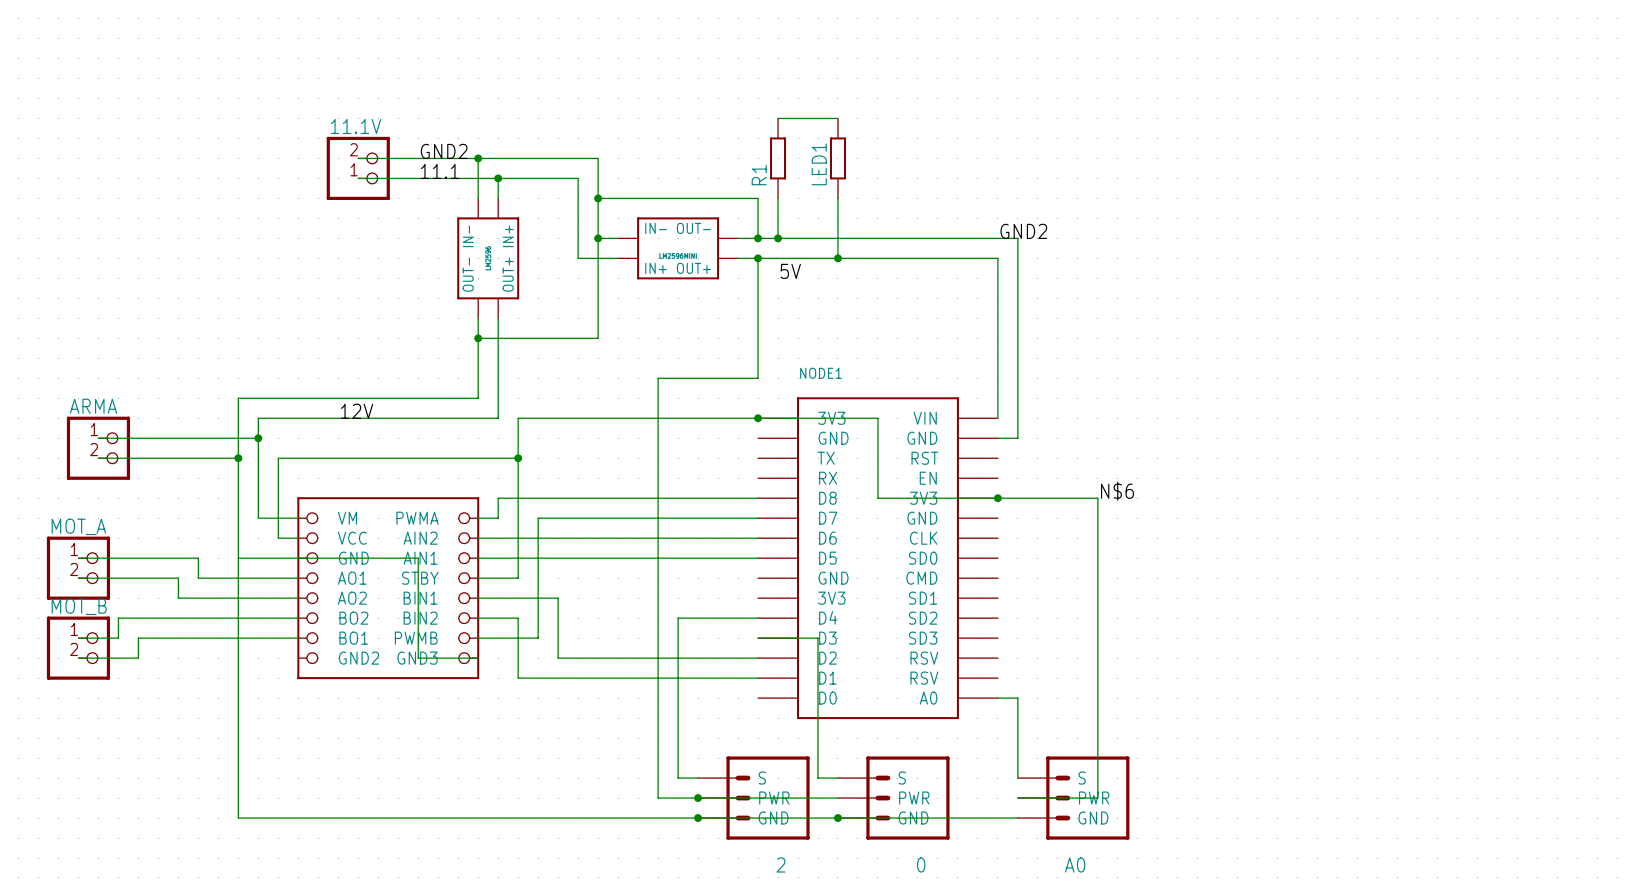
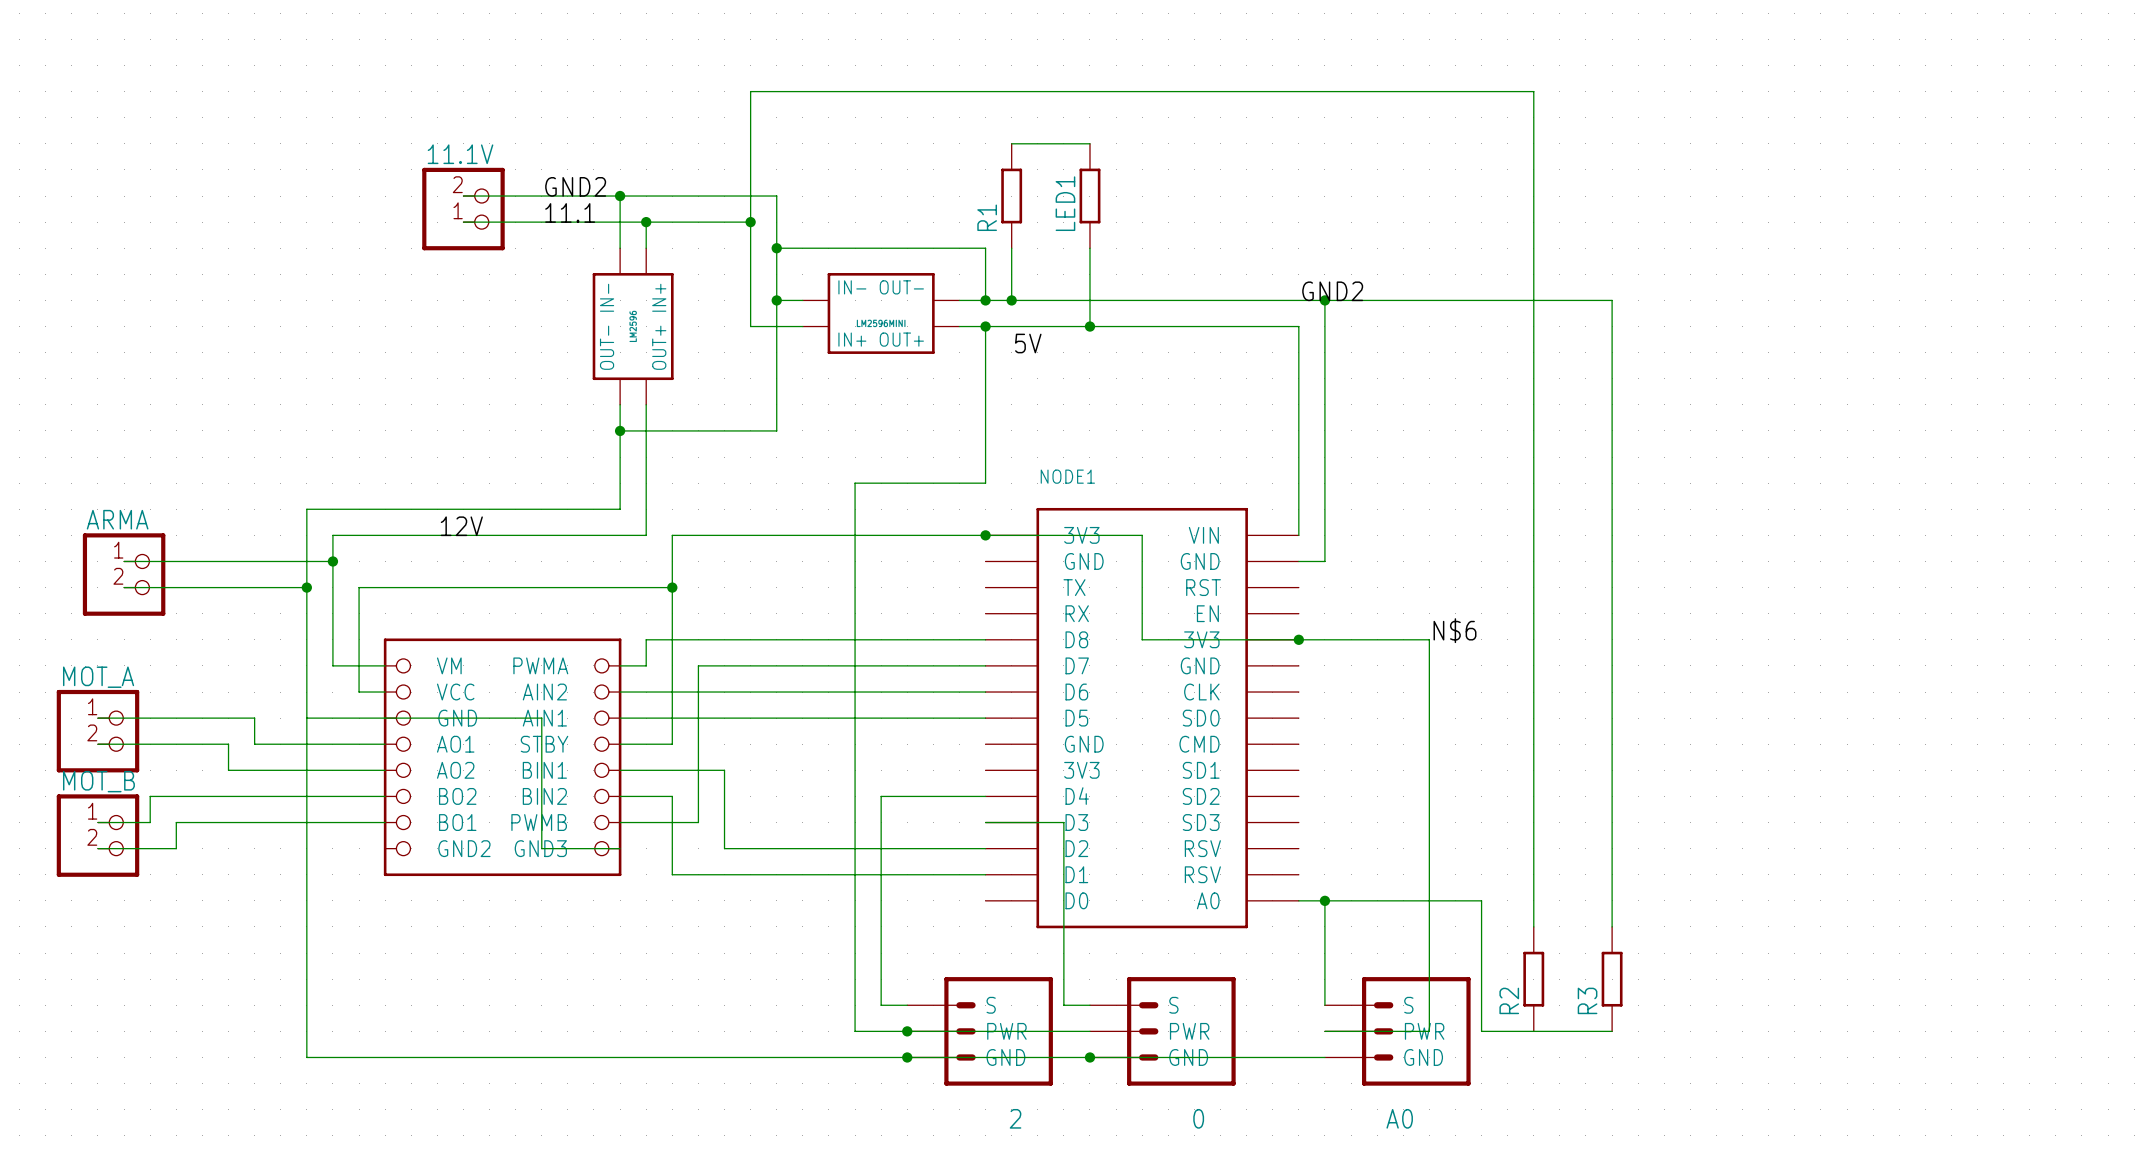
wire: none -> (750, 222) (750, 91) (1533, 91) (1533, 926)
junction: none -> (750, 222)
wire: none -> (1324, 300) (1612, 300) (1612, 926)
junction: none -> (1324, 300)
wire: none -> (1324, 900) (1481, 900) (1481, 1031) (1612, 1031)
junction: none -> (1324, 900)
R2: none -> (1533, 979)
R3: none -> (1612, 979)

